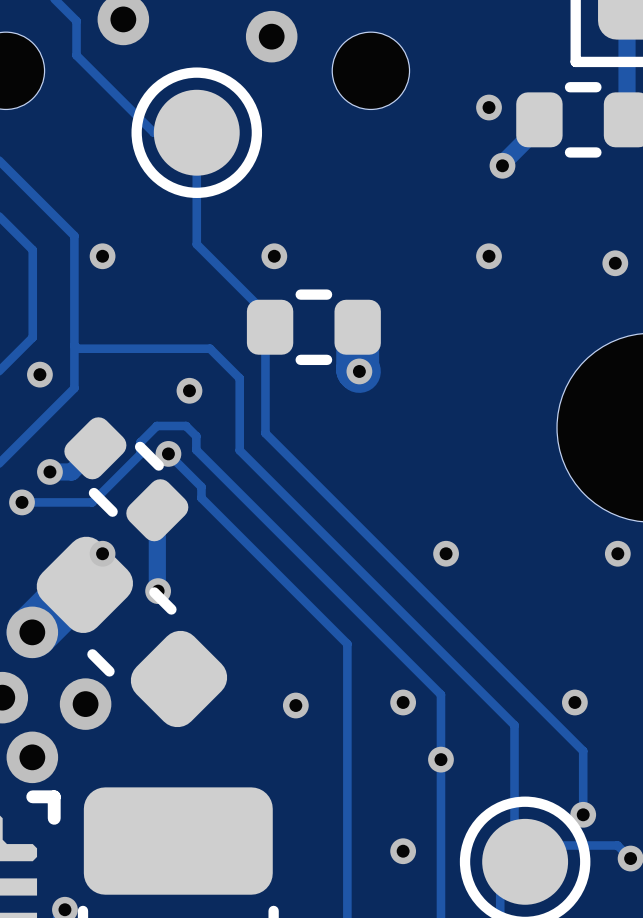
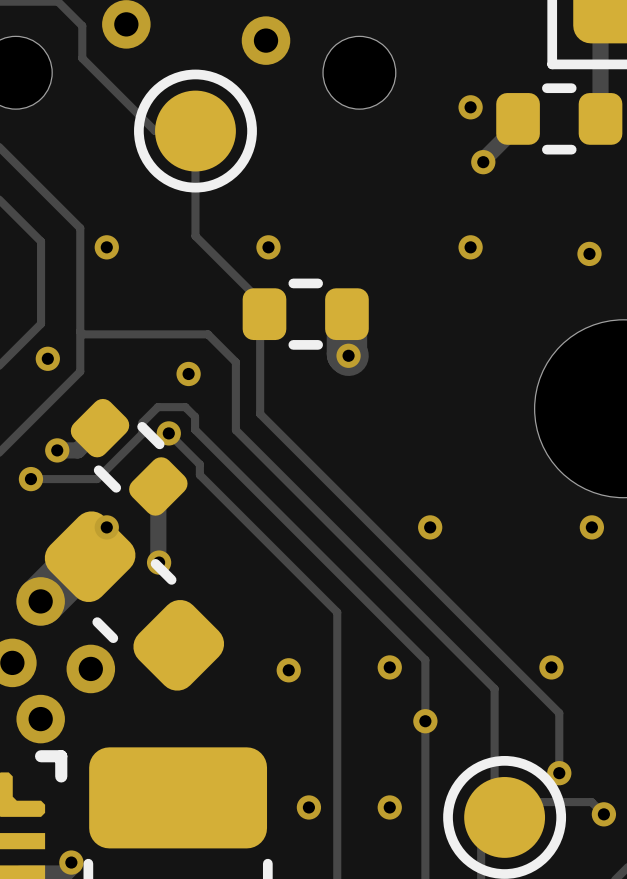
via: none -> (308, 807)

